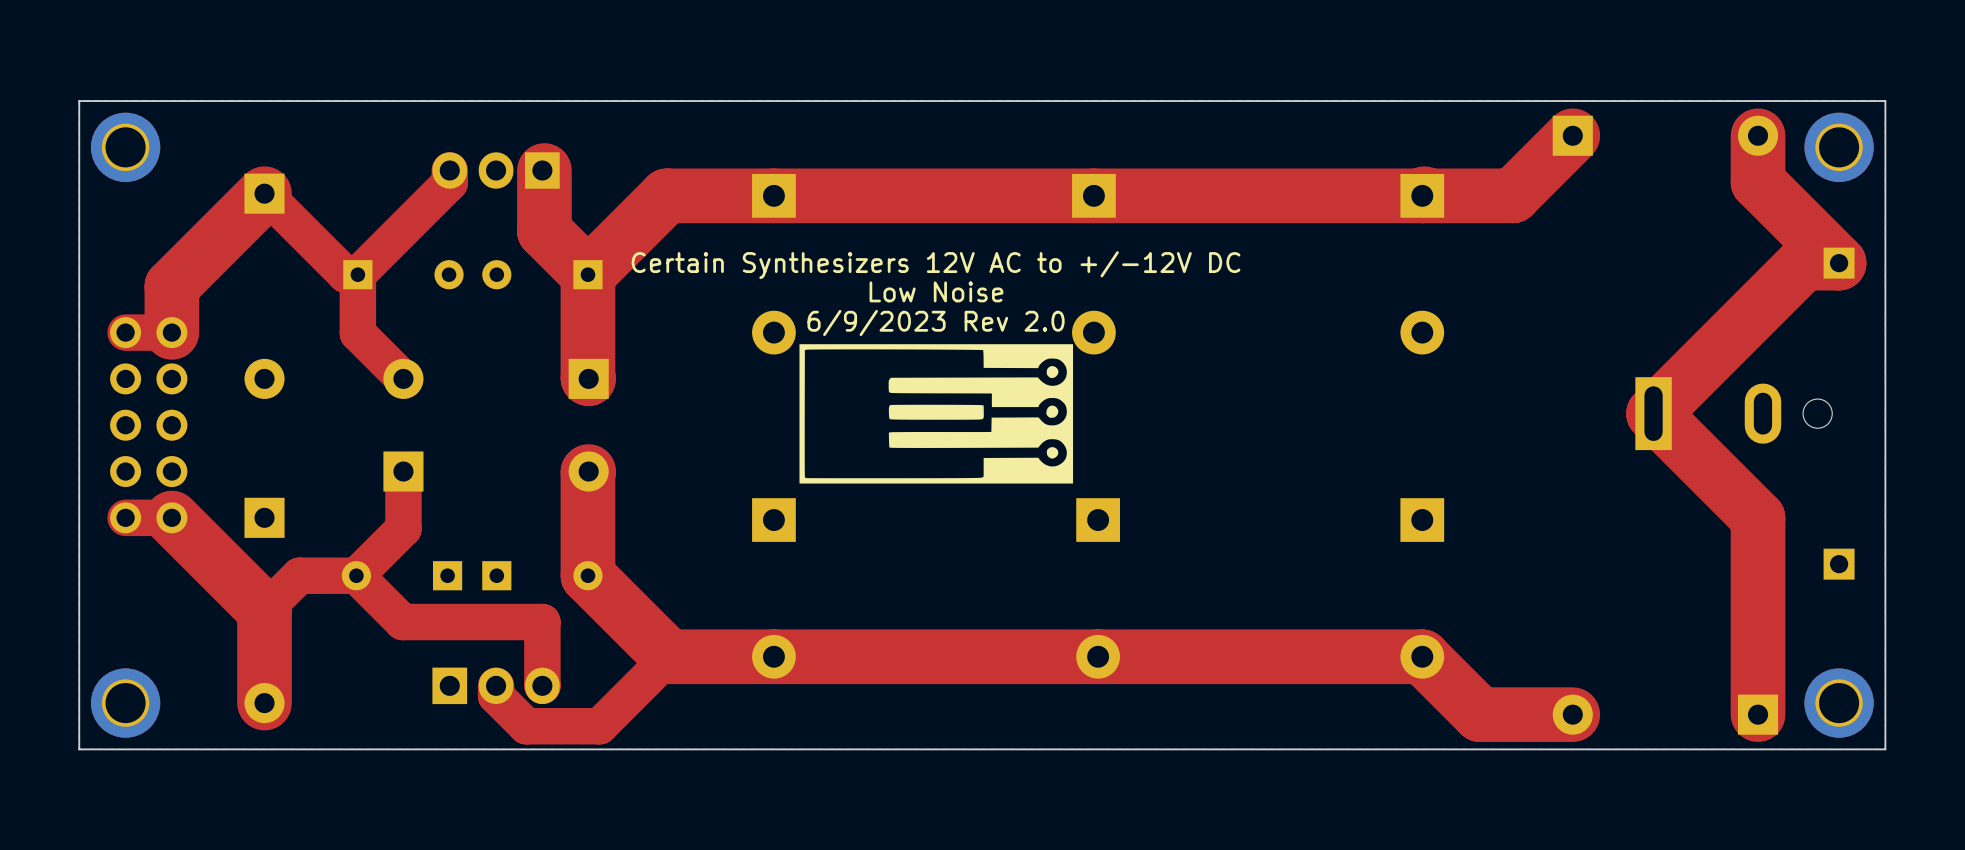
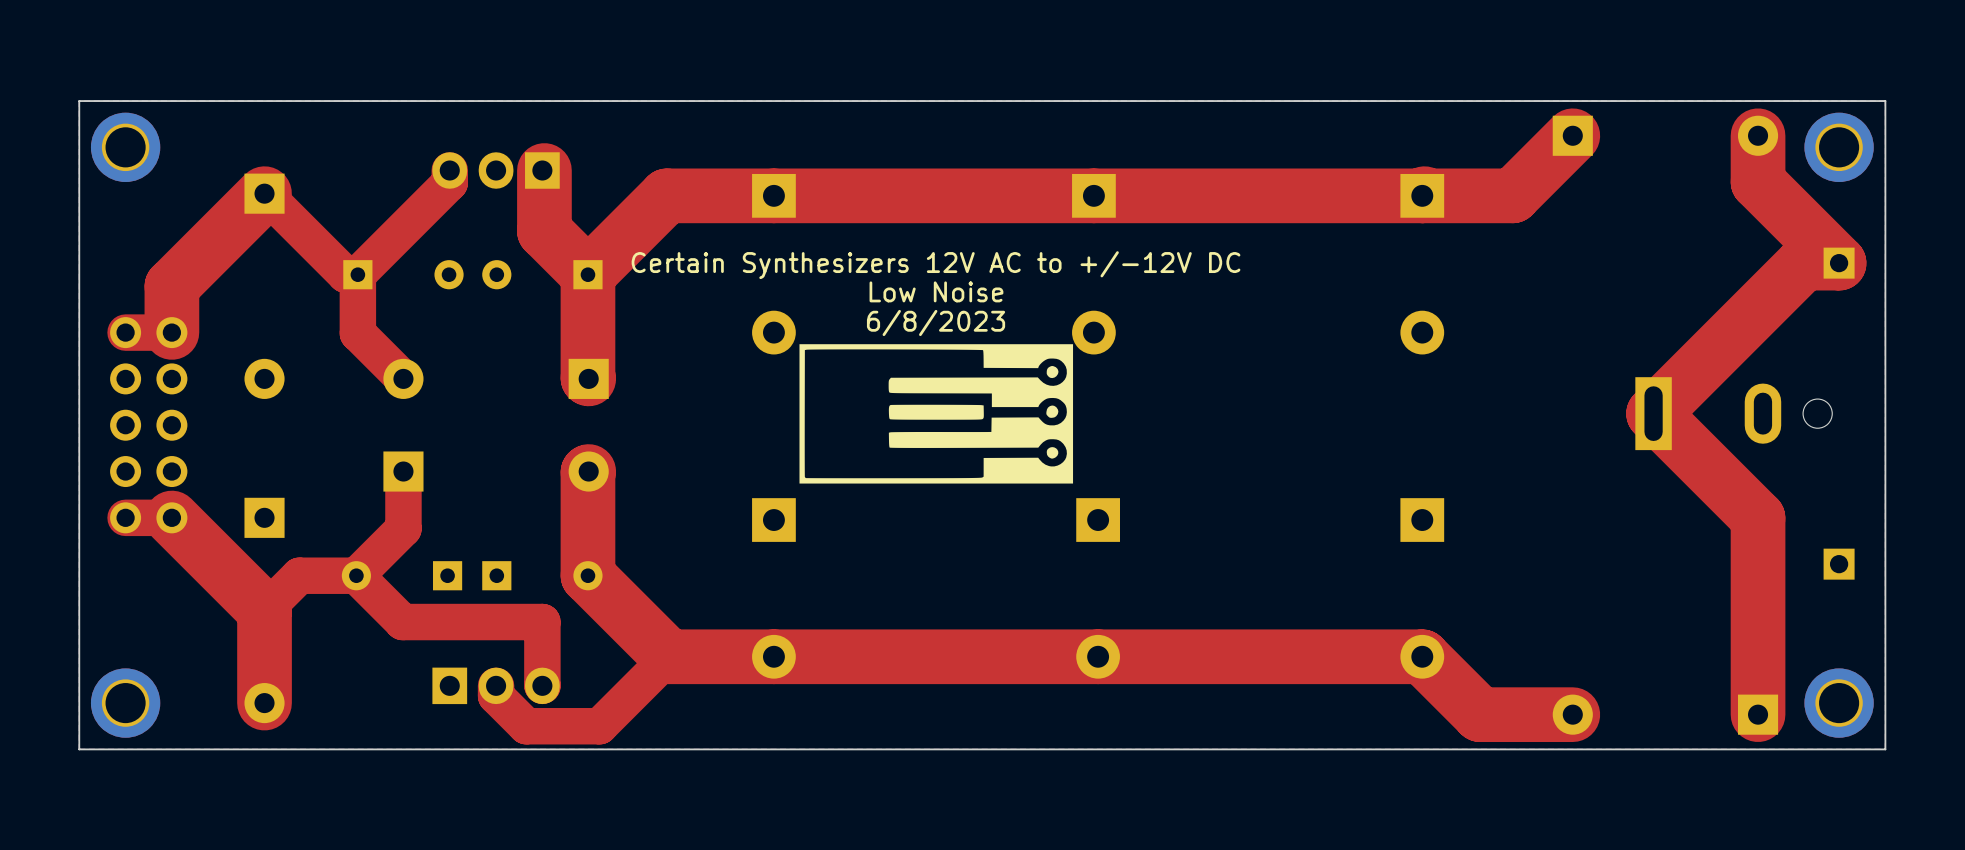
text: 6/9/2023 Rev 2.0 (936, 322) -> 6/8/2023 (936, 322)

